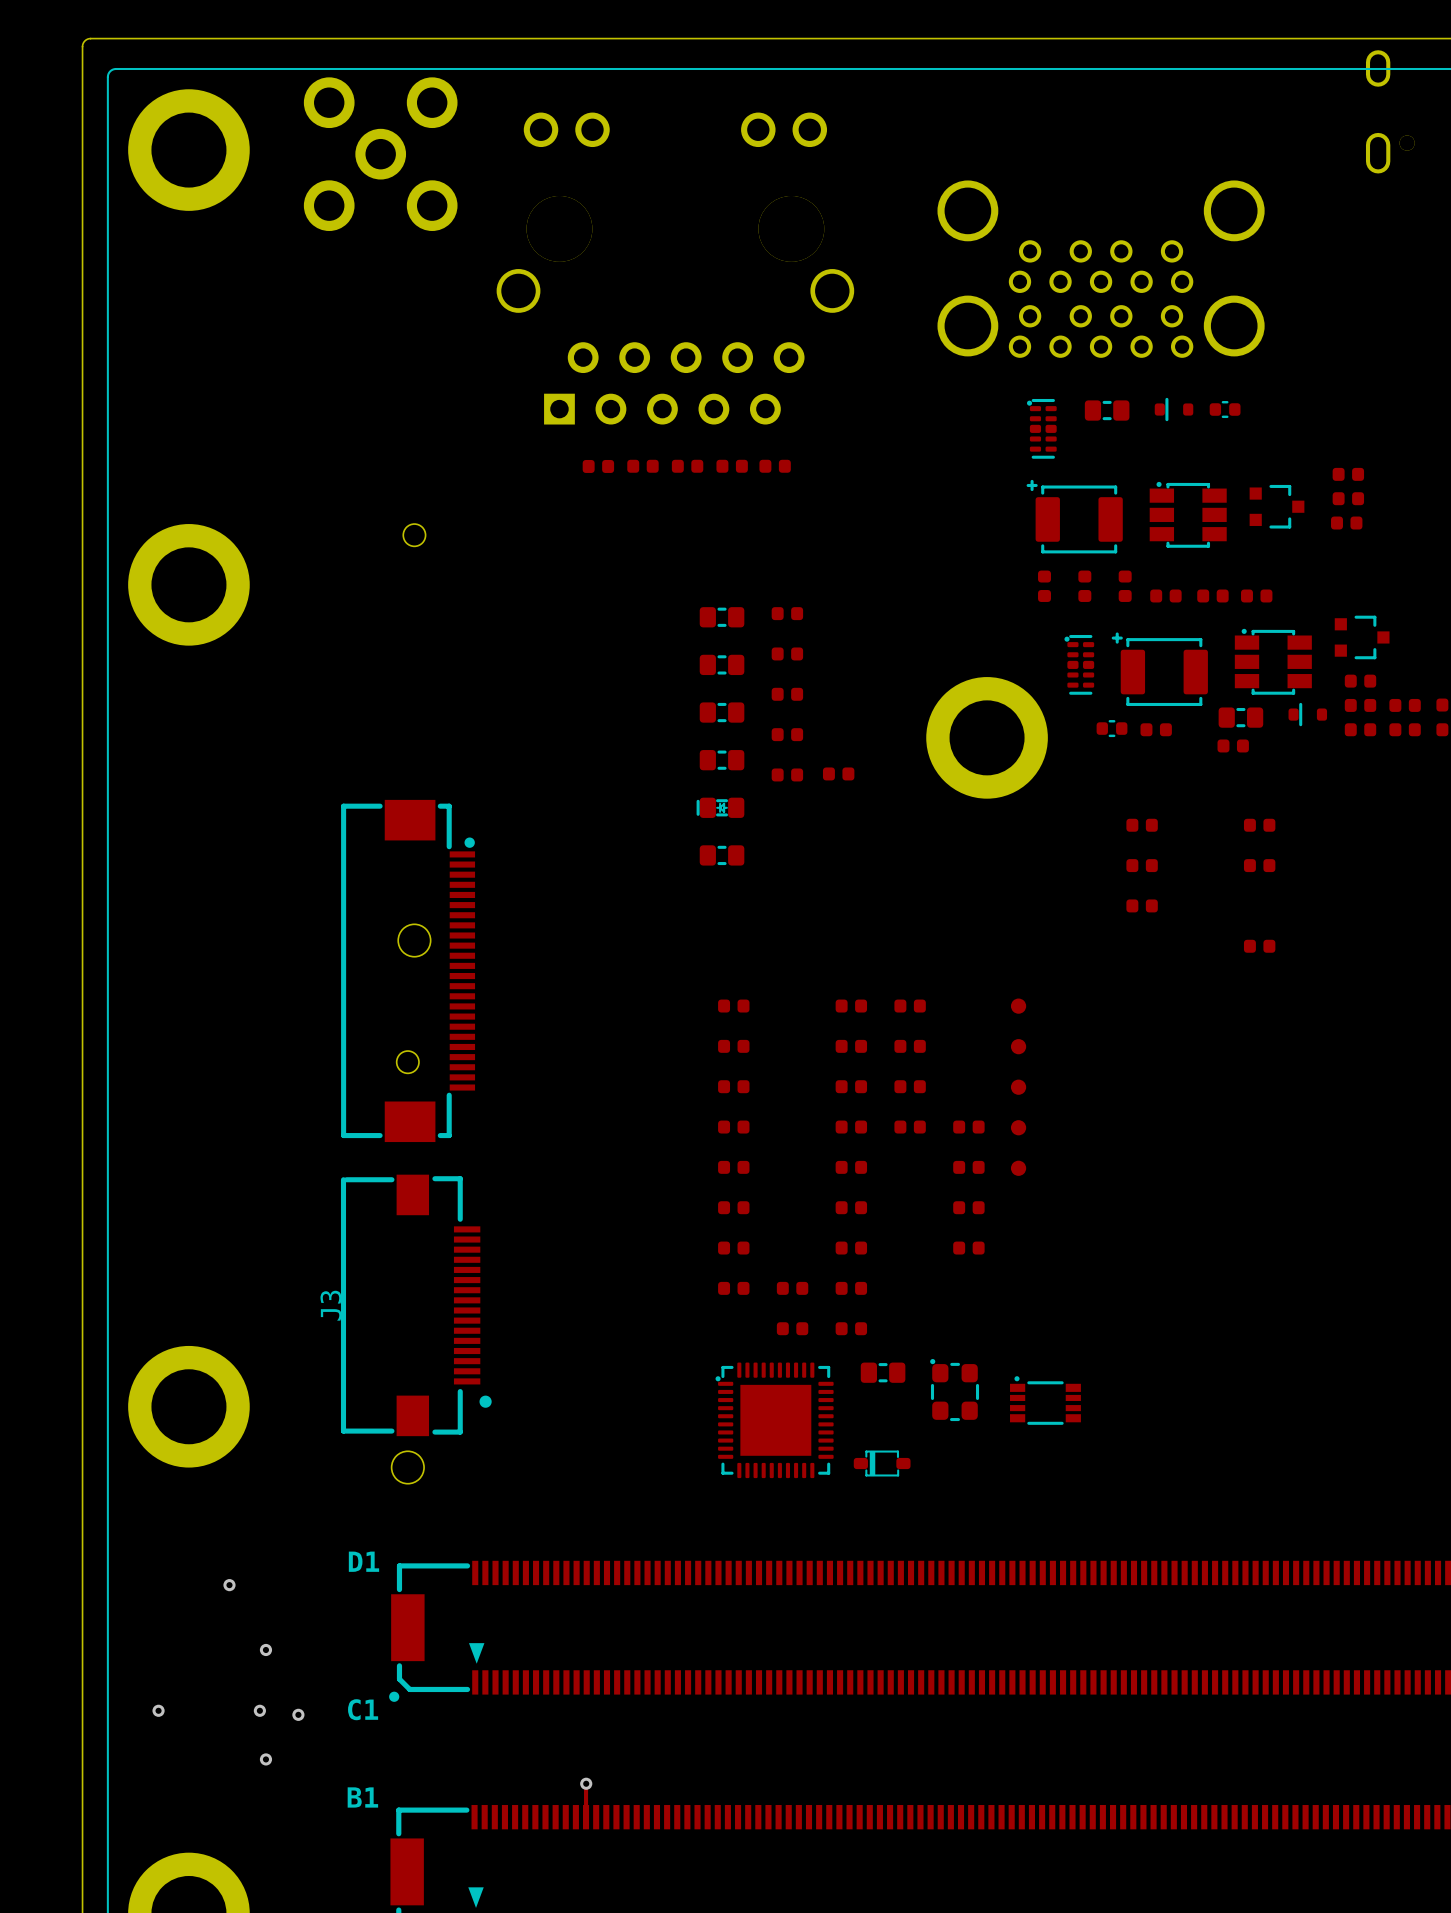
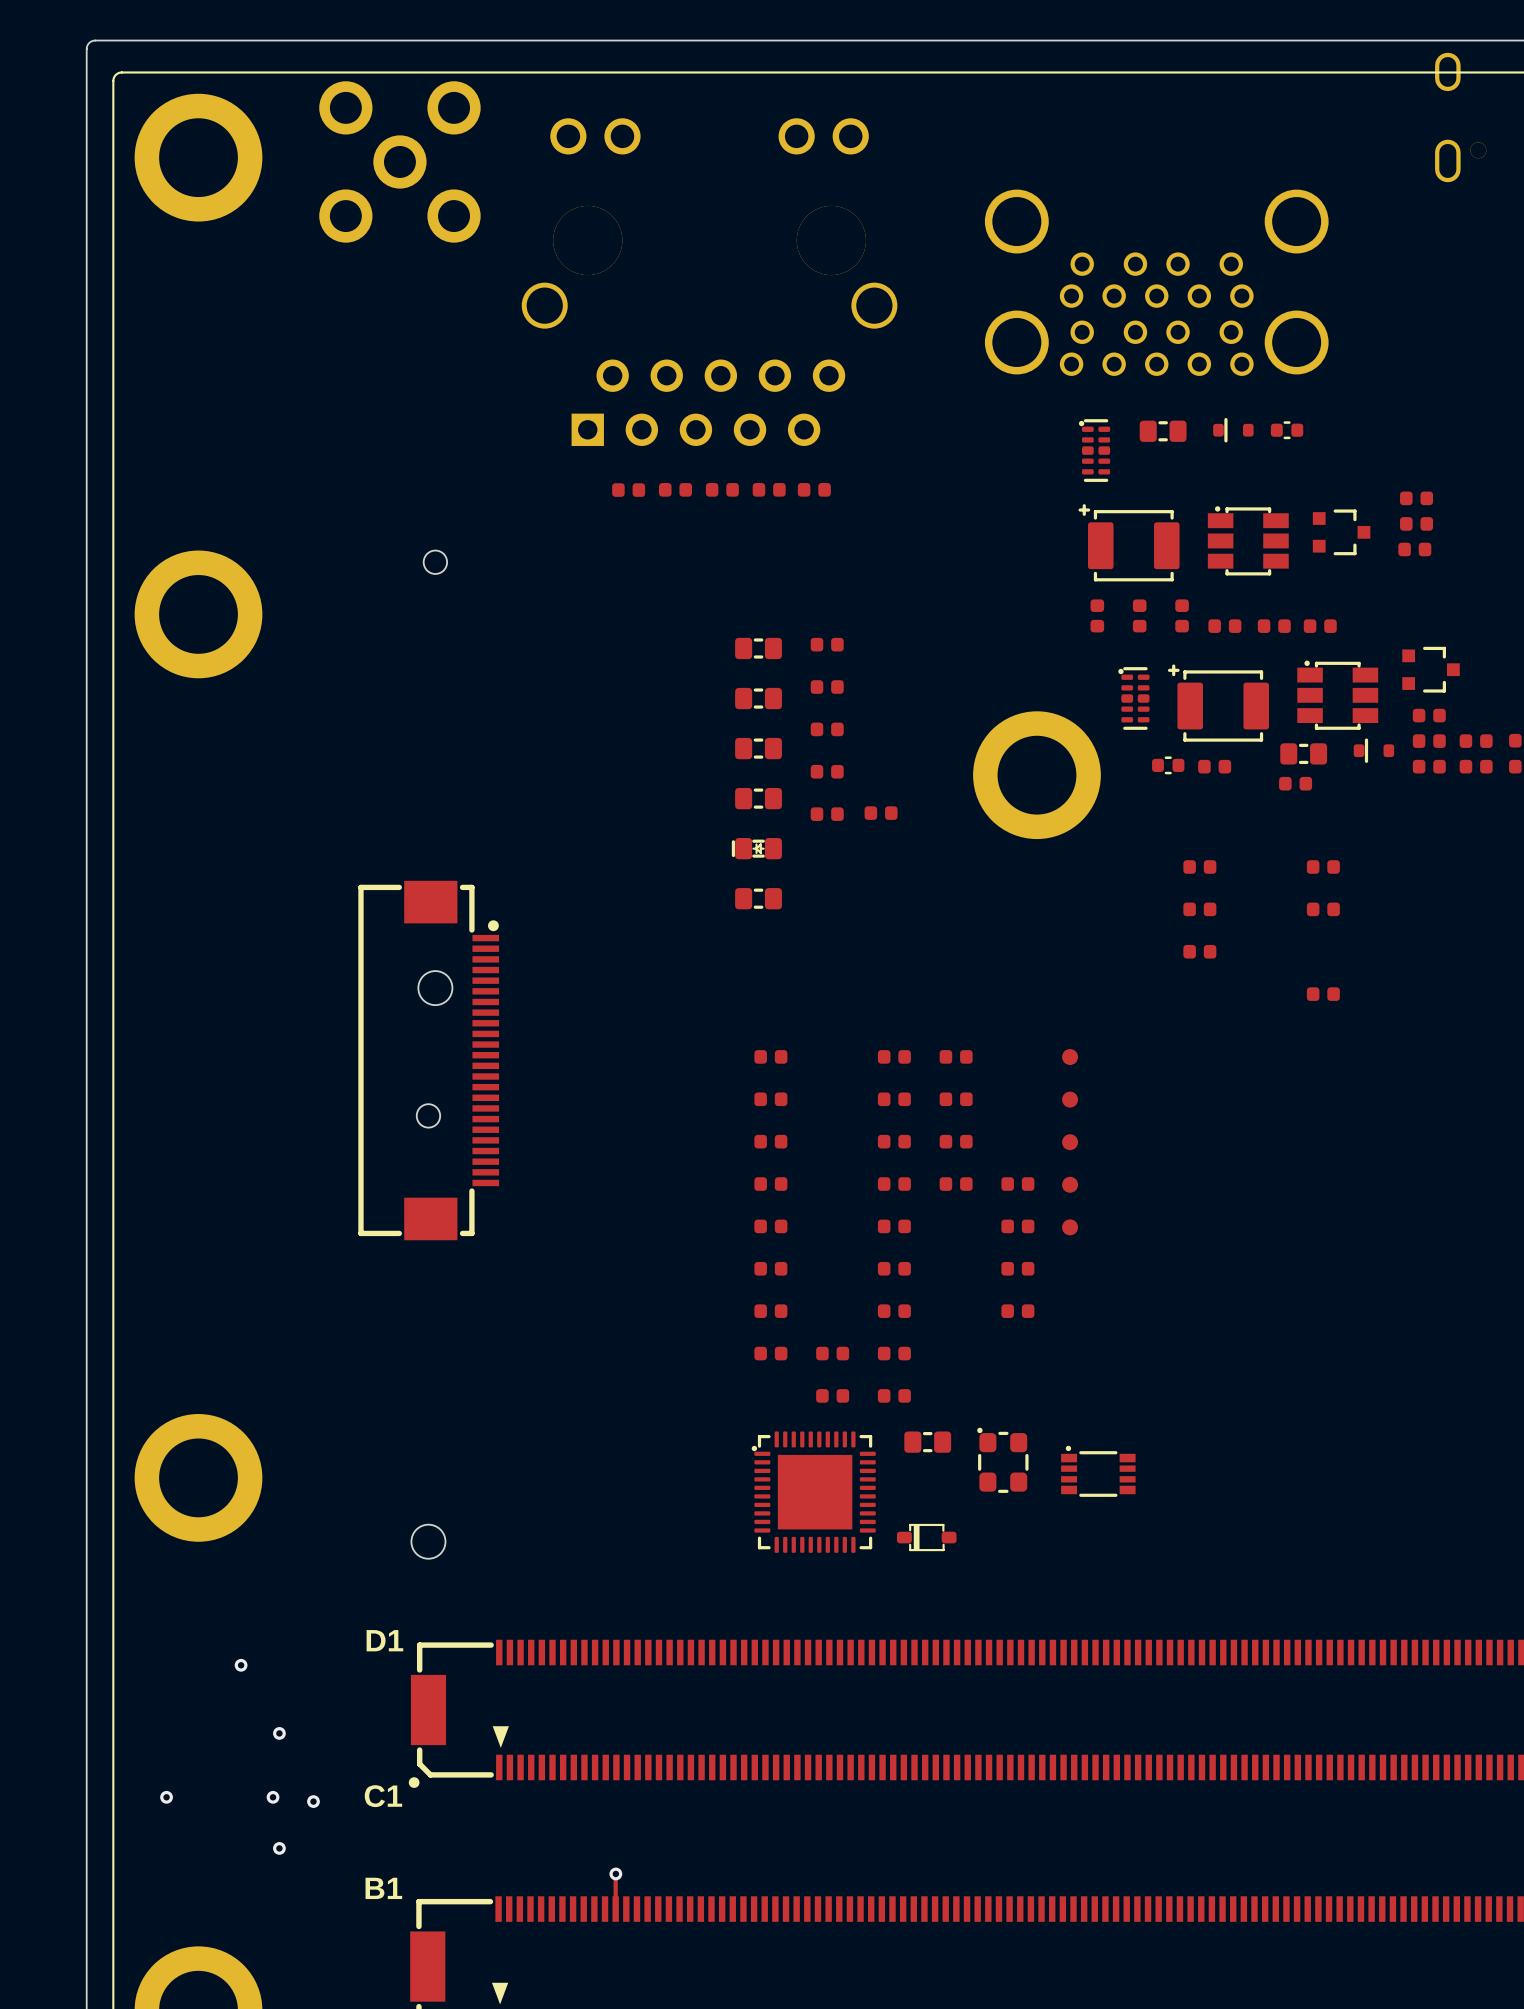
part position: (408, 970) -> (428, 1060)
J3: (416, 1305) -> none

